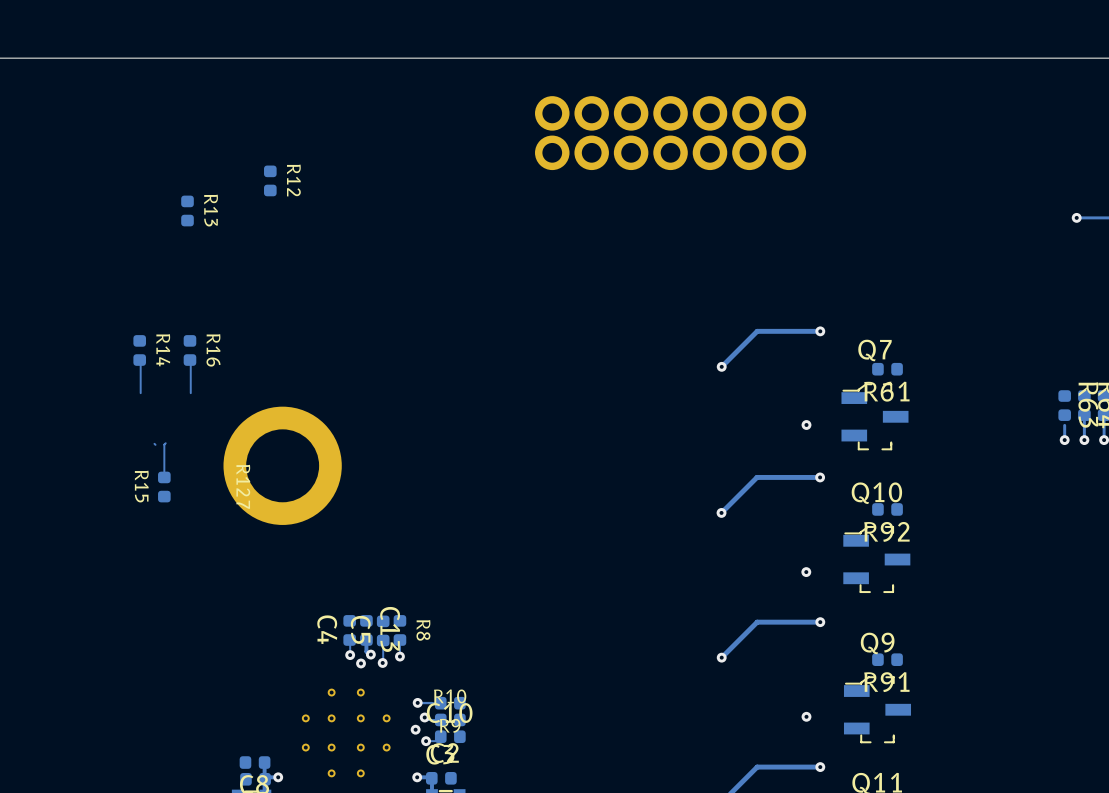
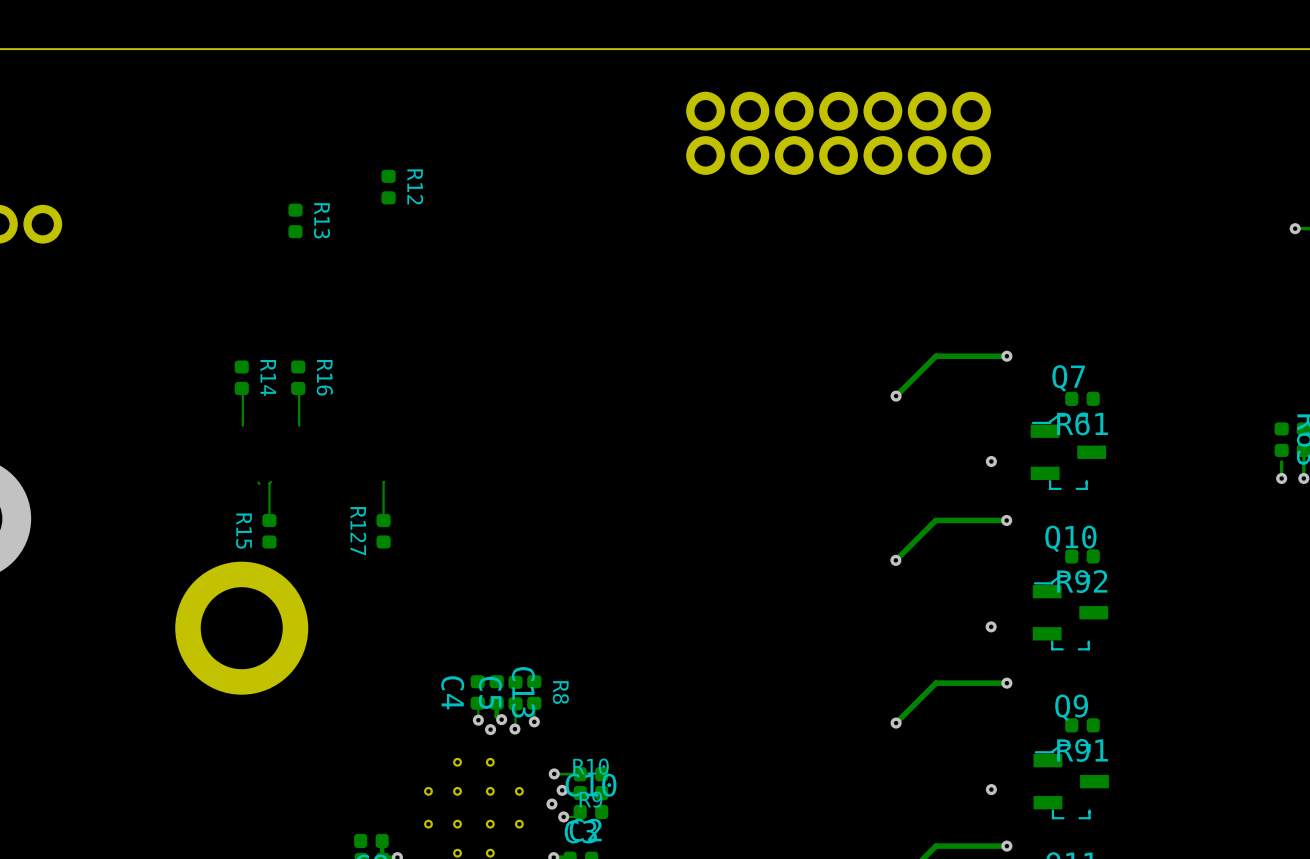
part position: (282, 465) -> (241, 628)

